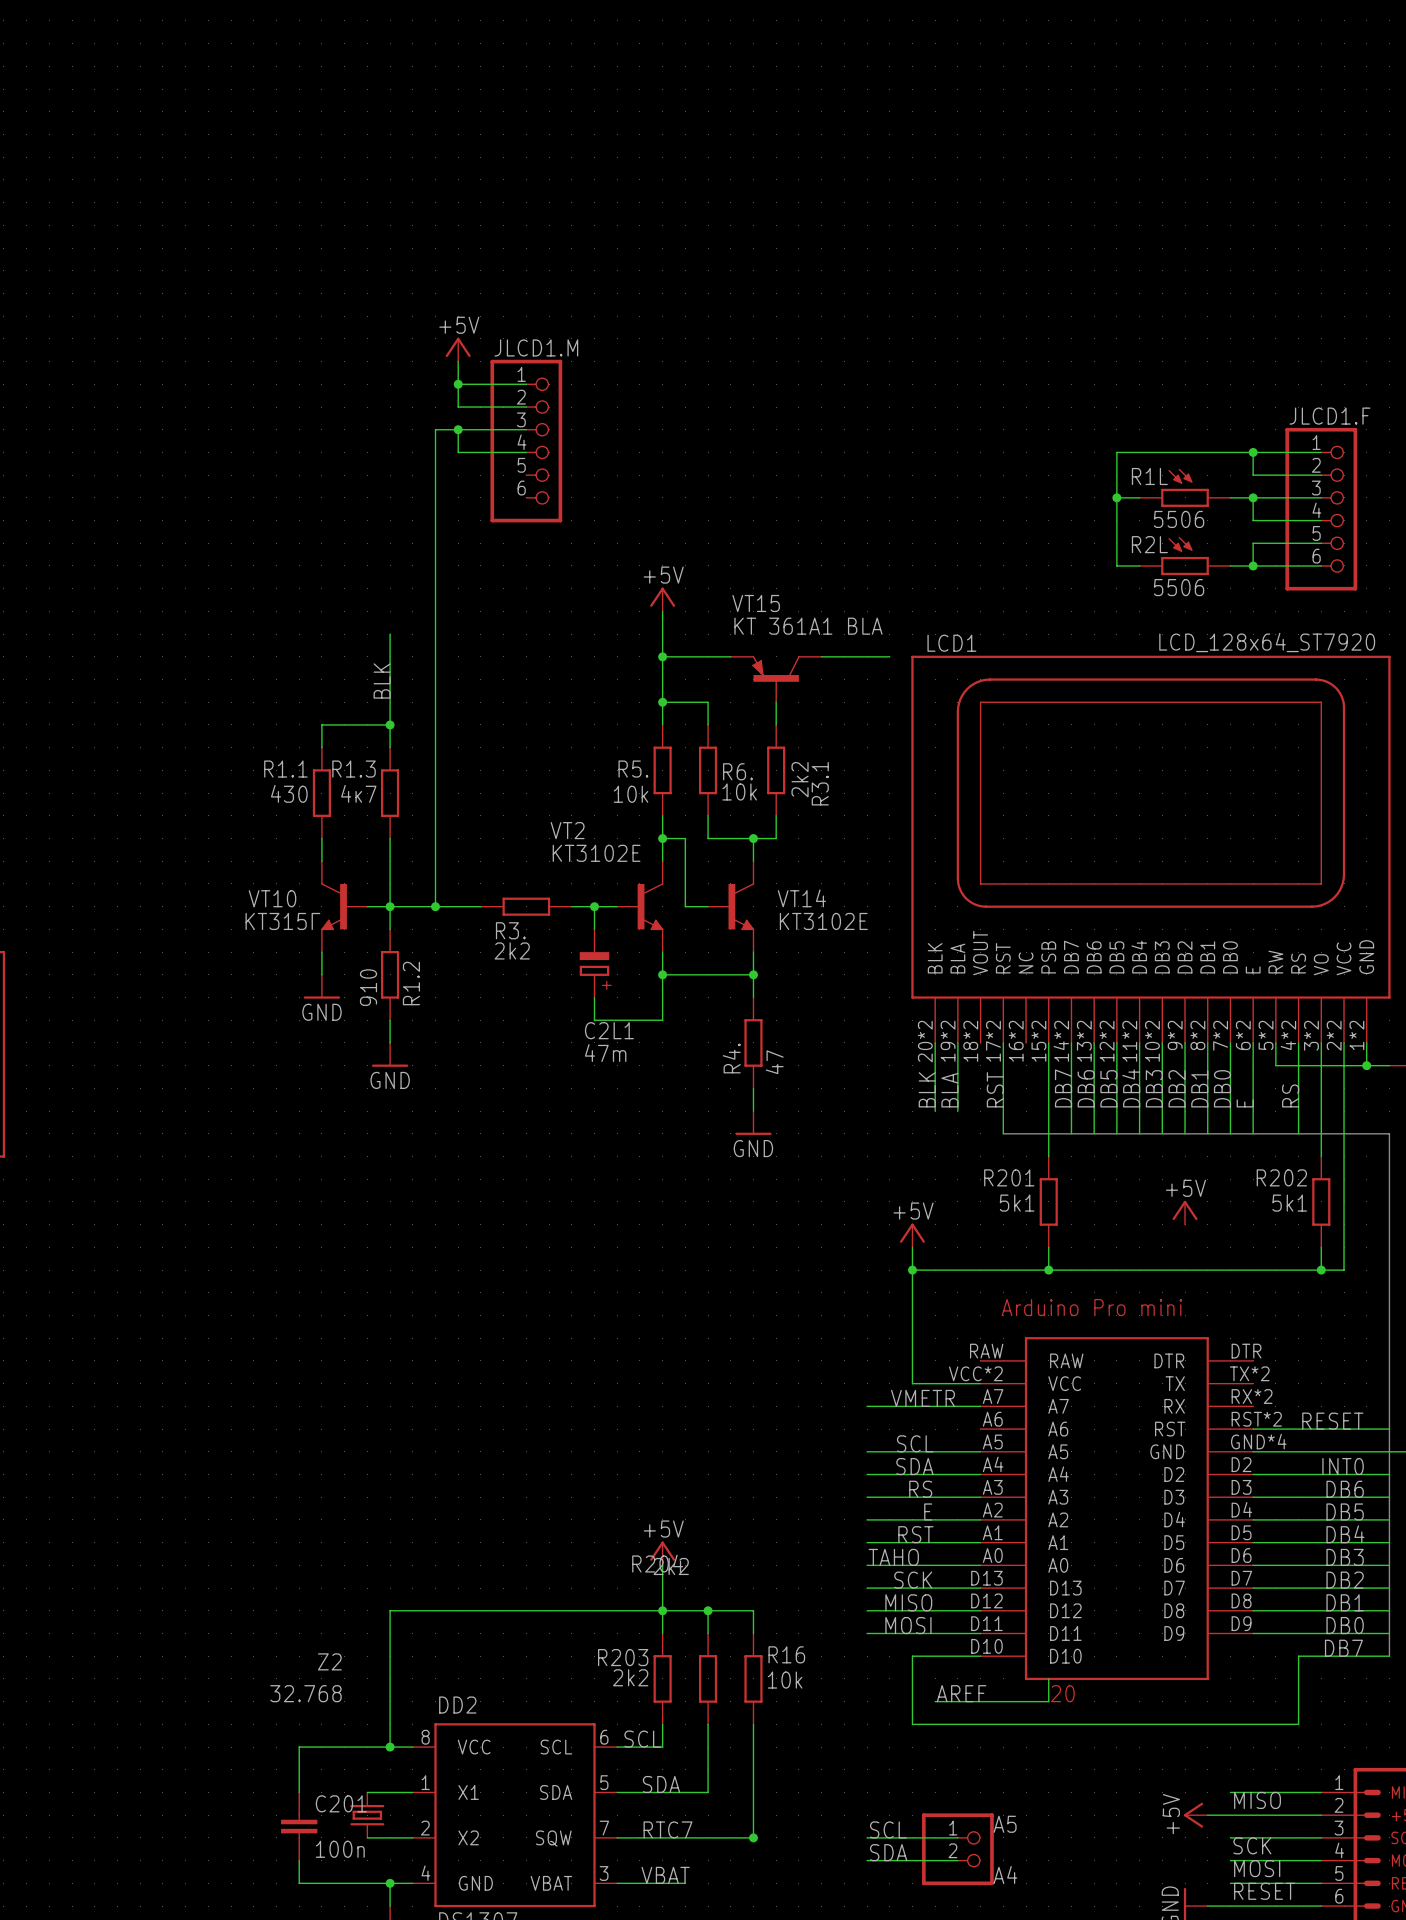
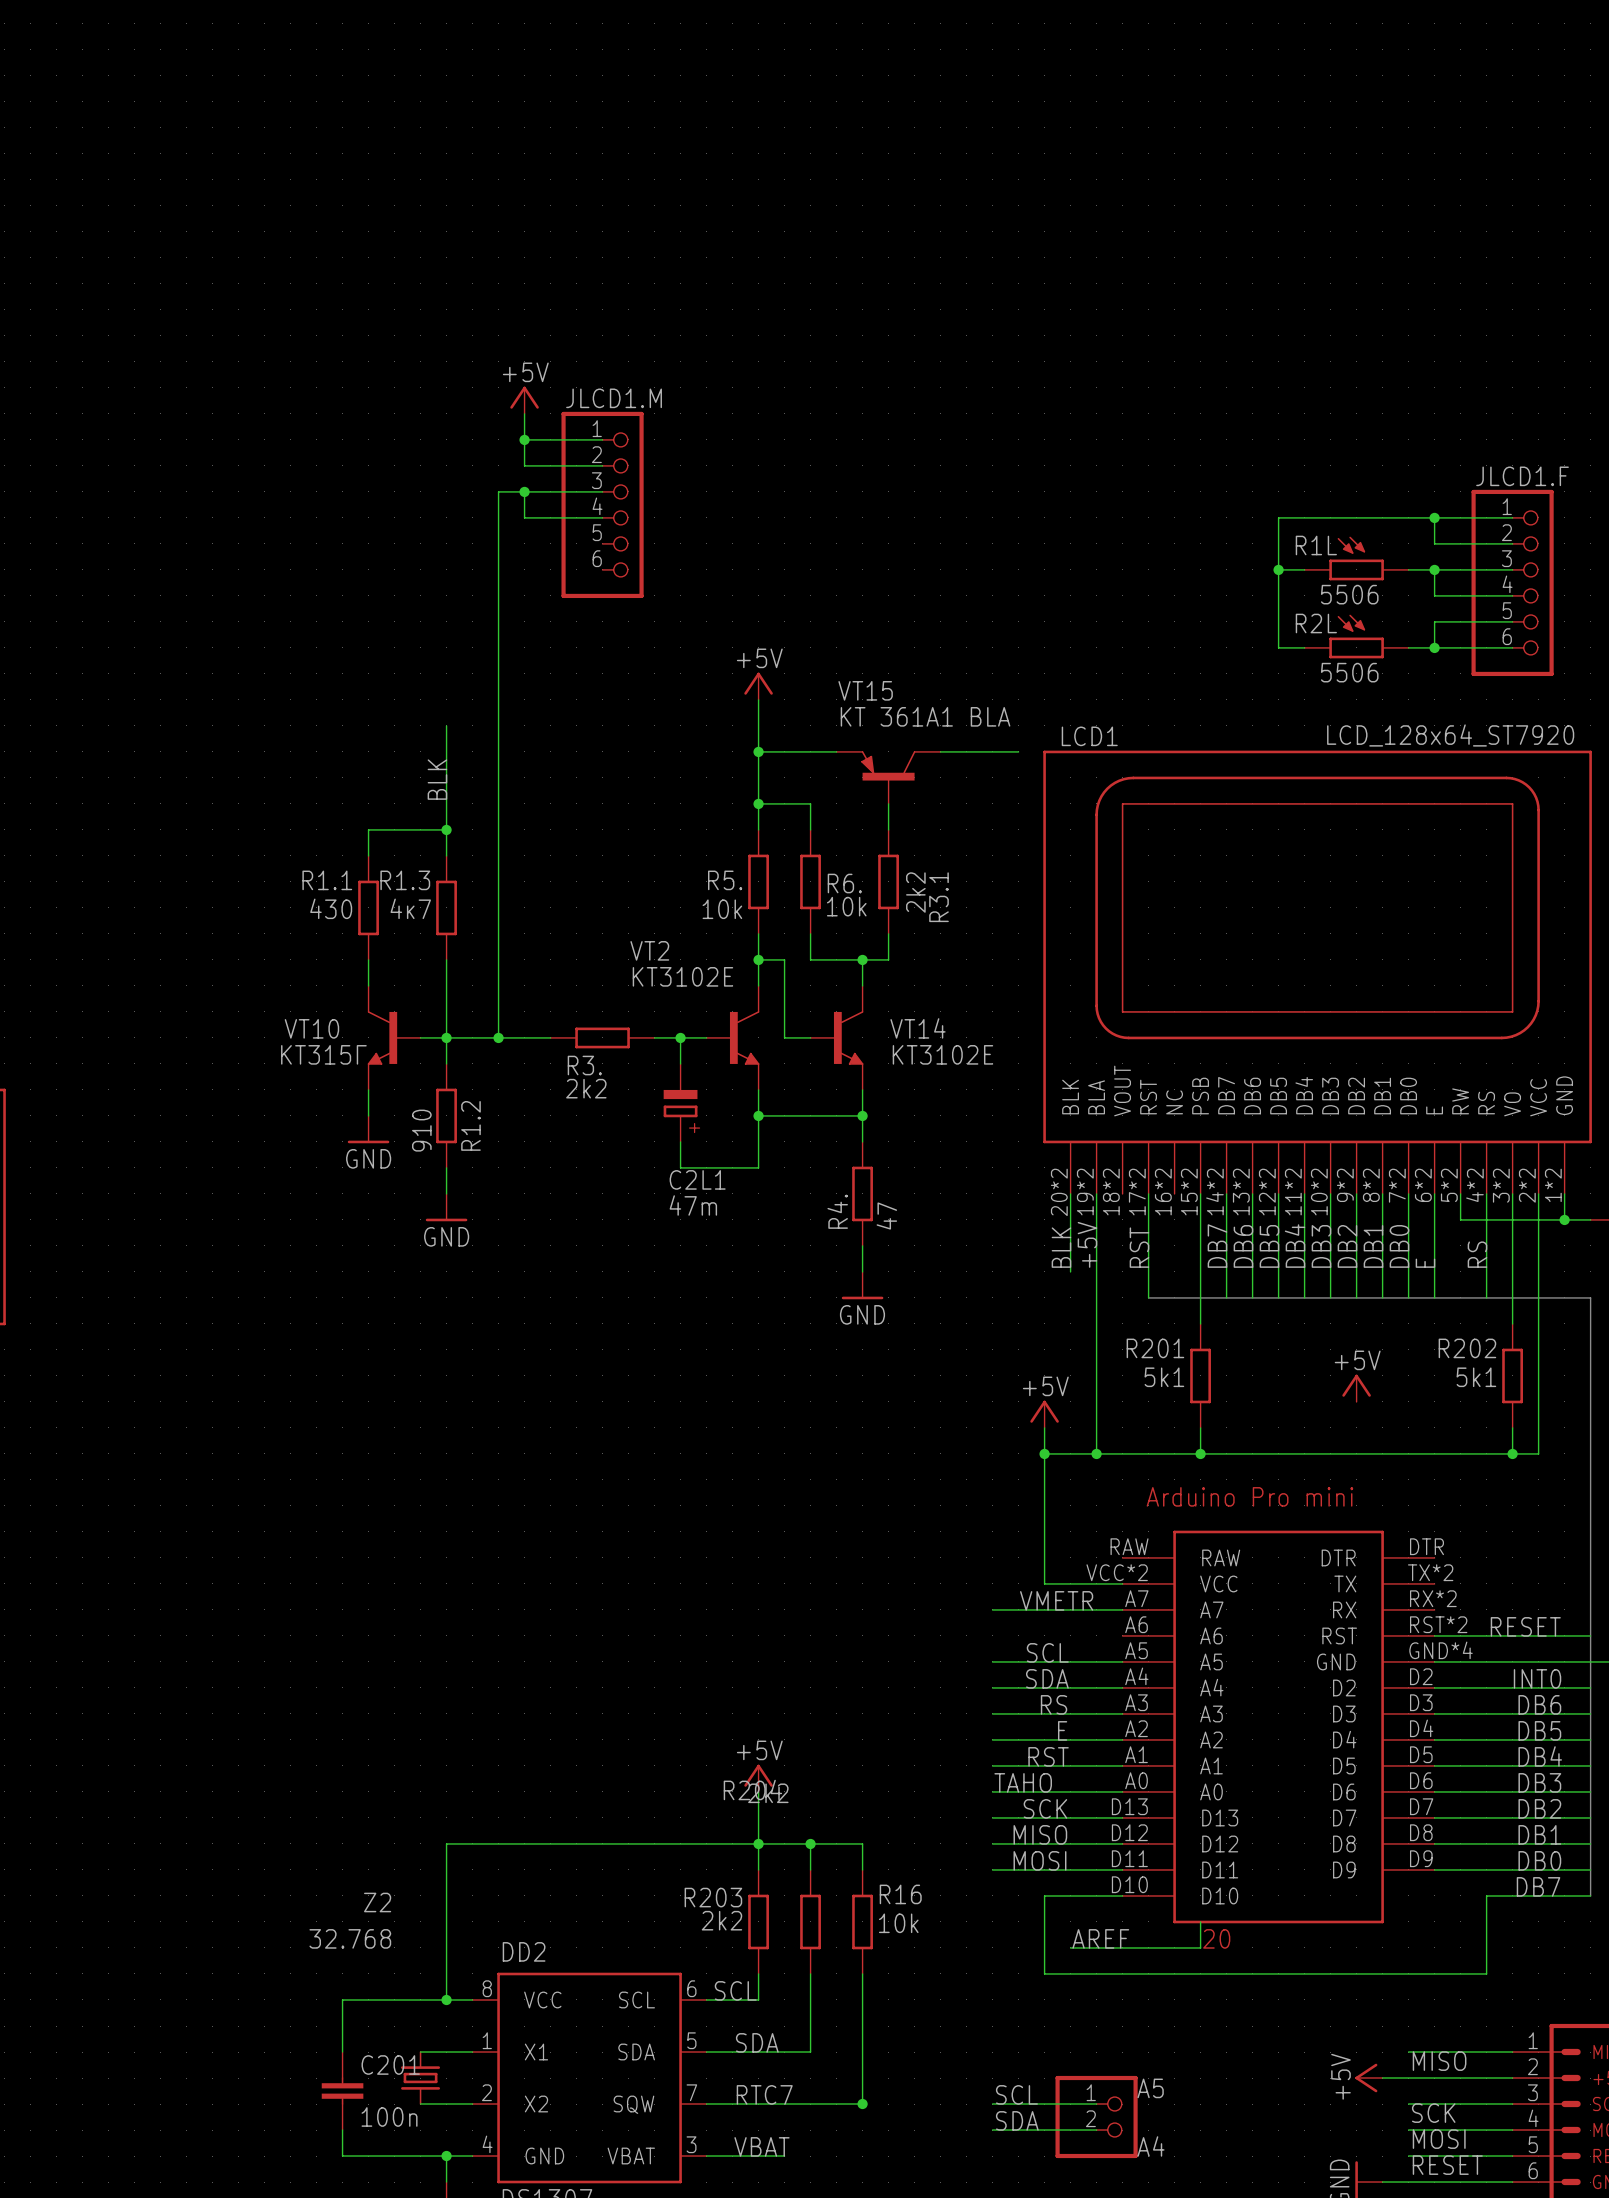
label: BLA (949, 1090) -> +5V (1087, 1244)
wire: none -> (1096, 1271) (1096, 1453)
junction: none -> (1096, 1453)

